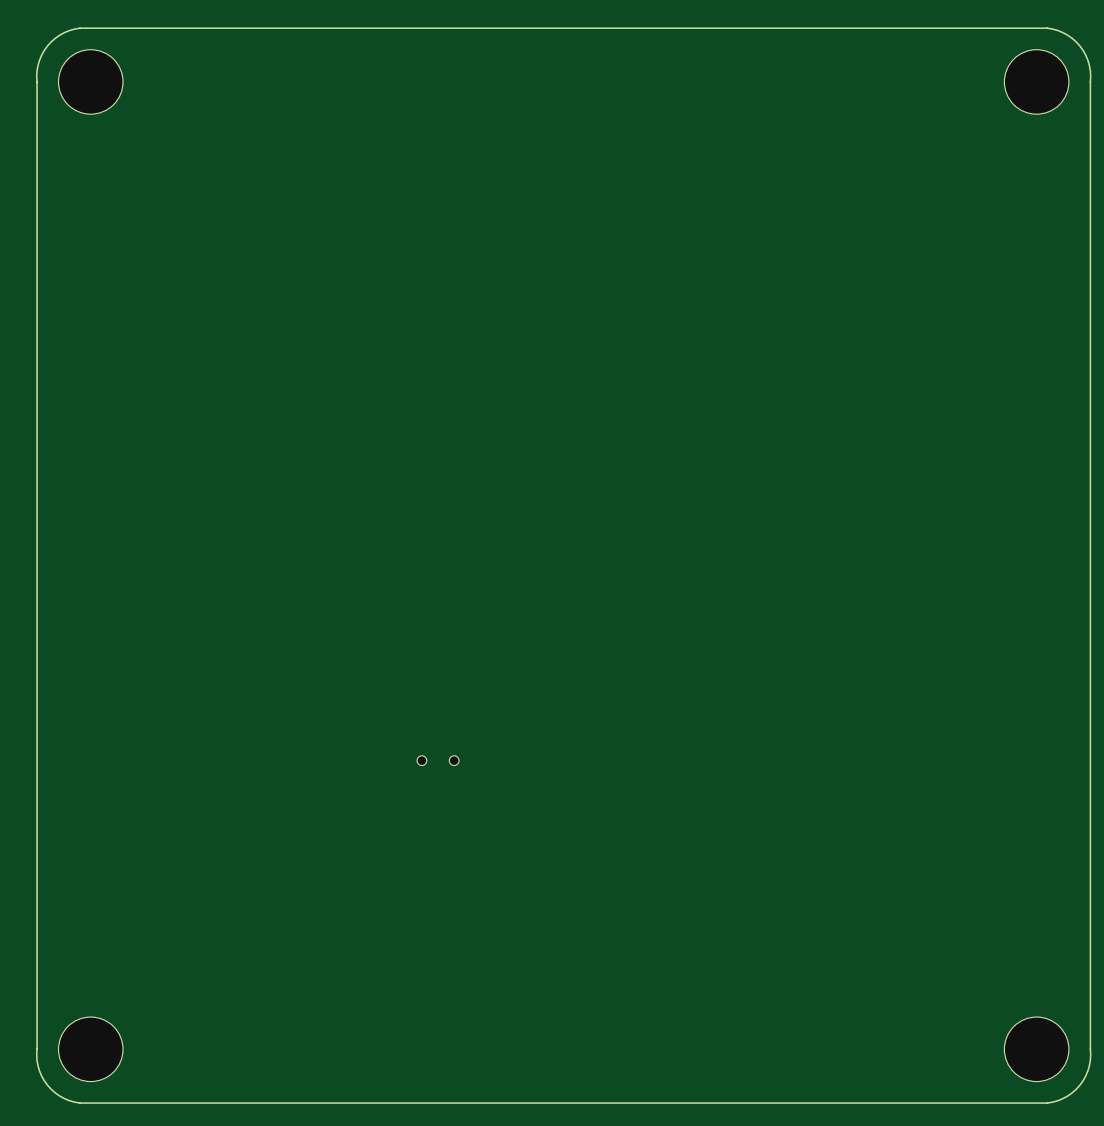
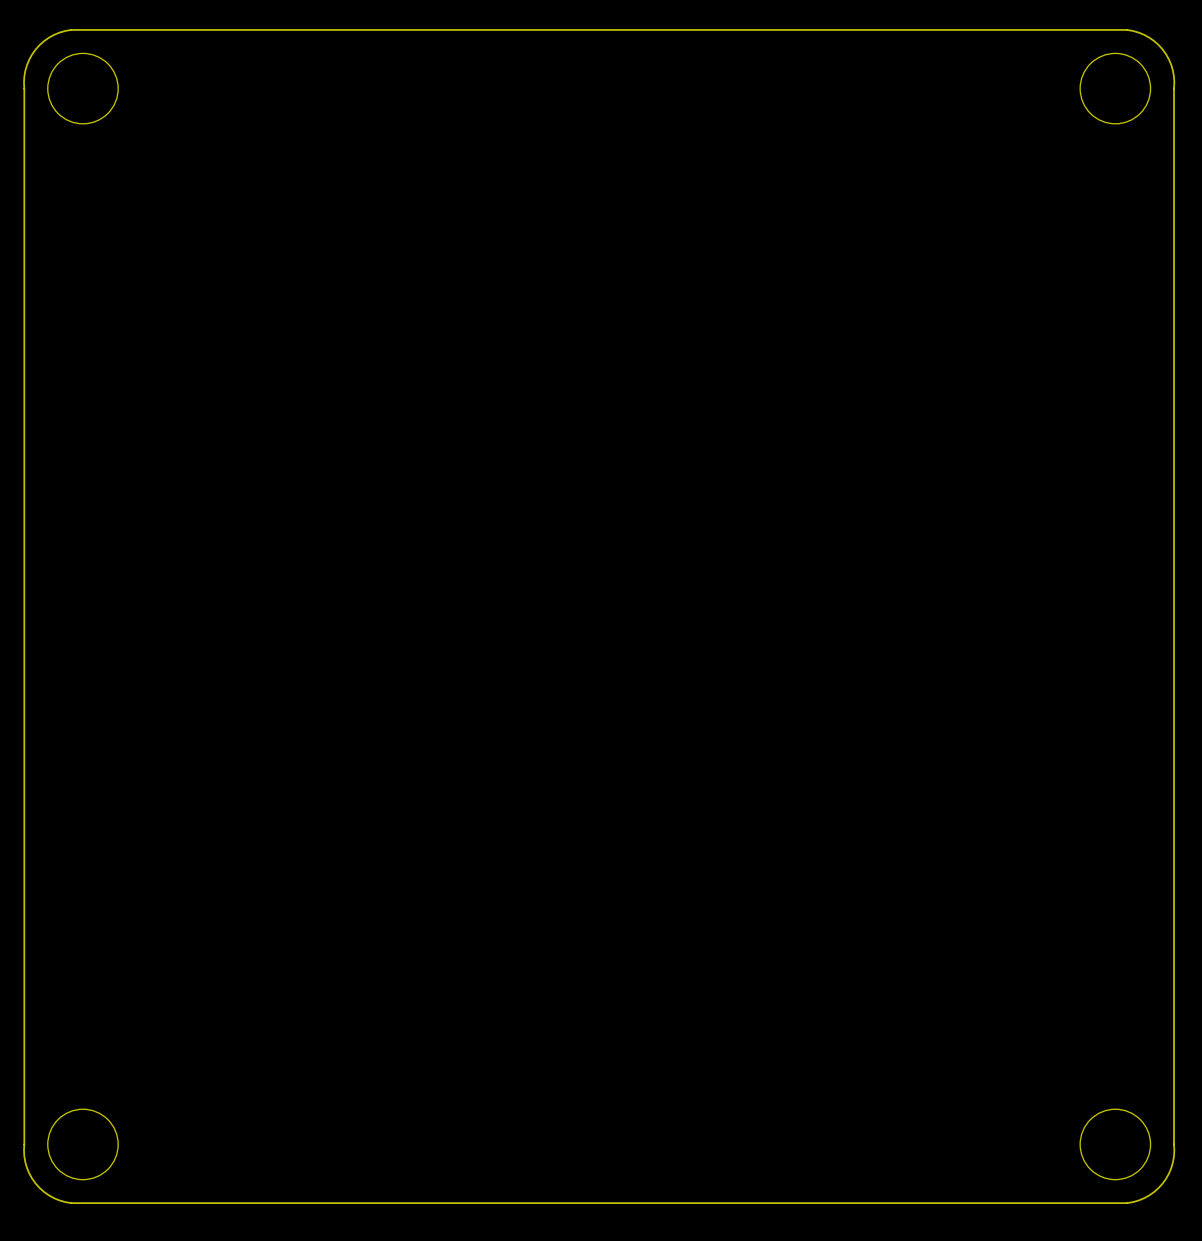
part: (438, 760) -> none

